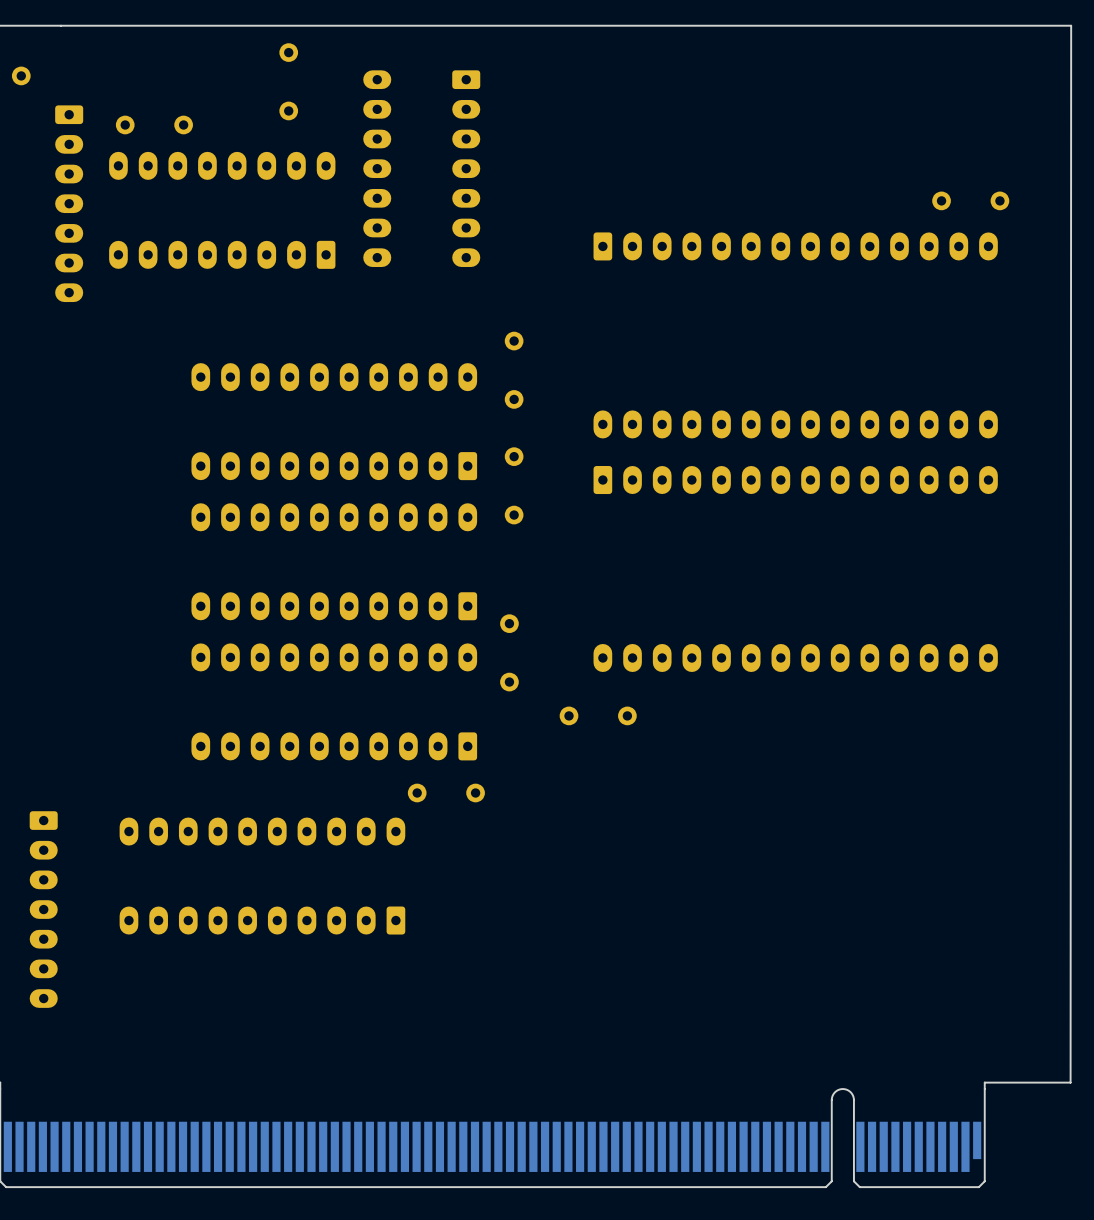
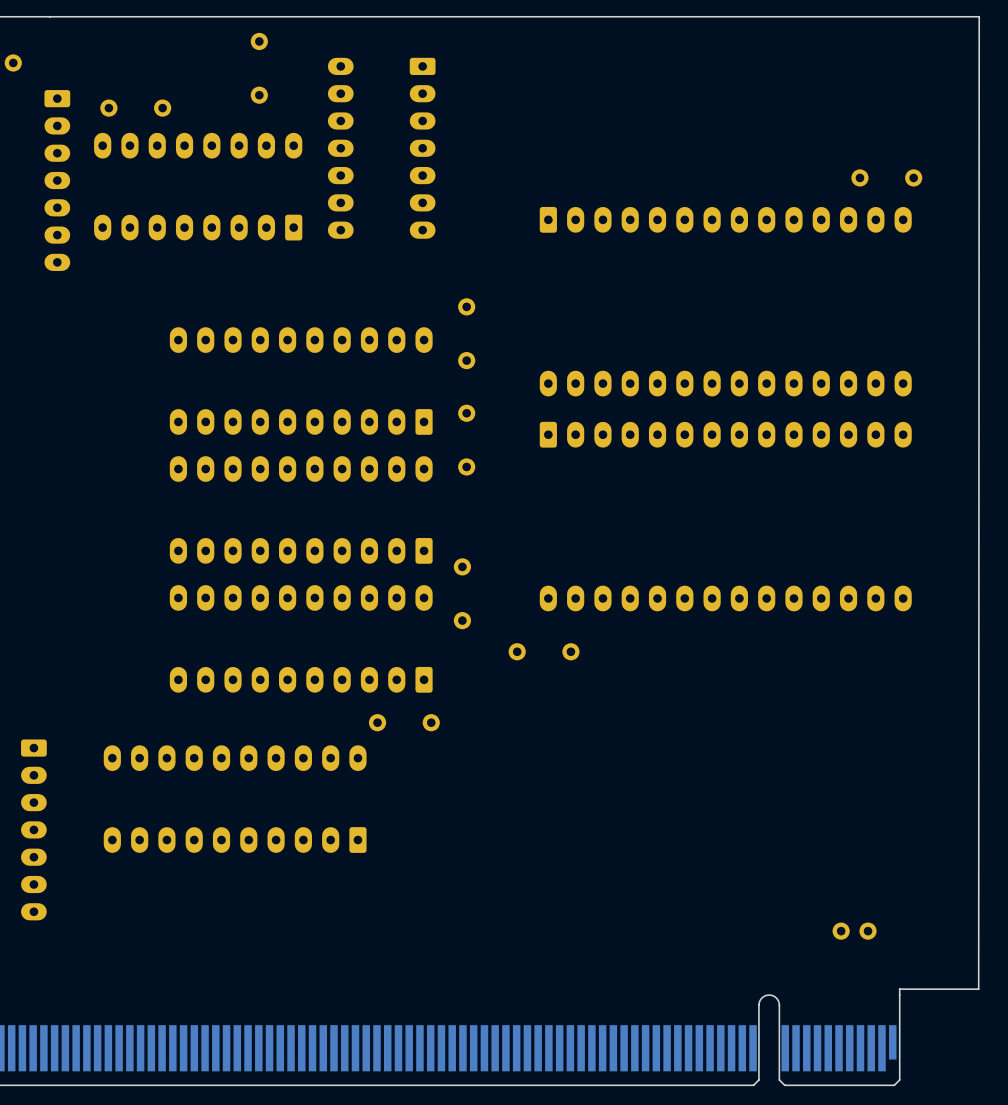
part: none -> (854, 931)

